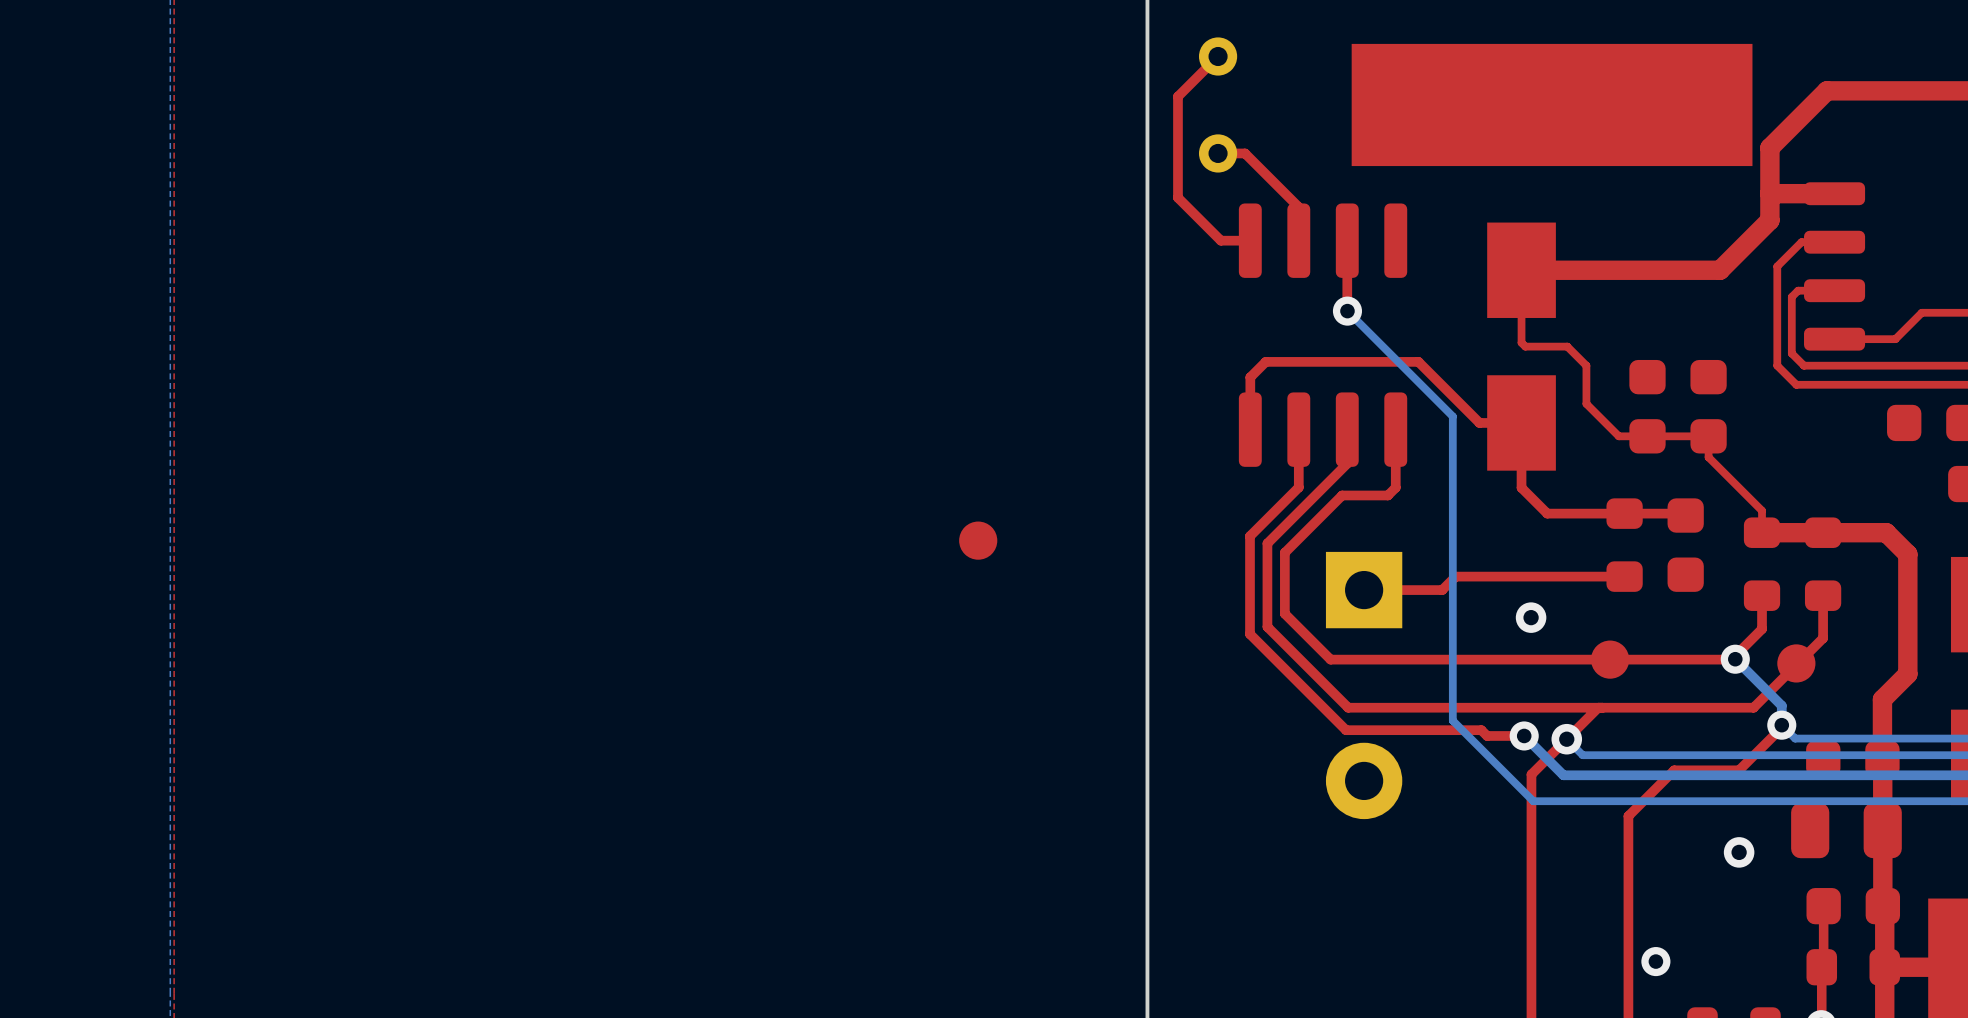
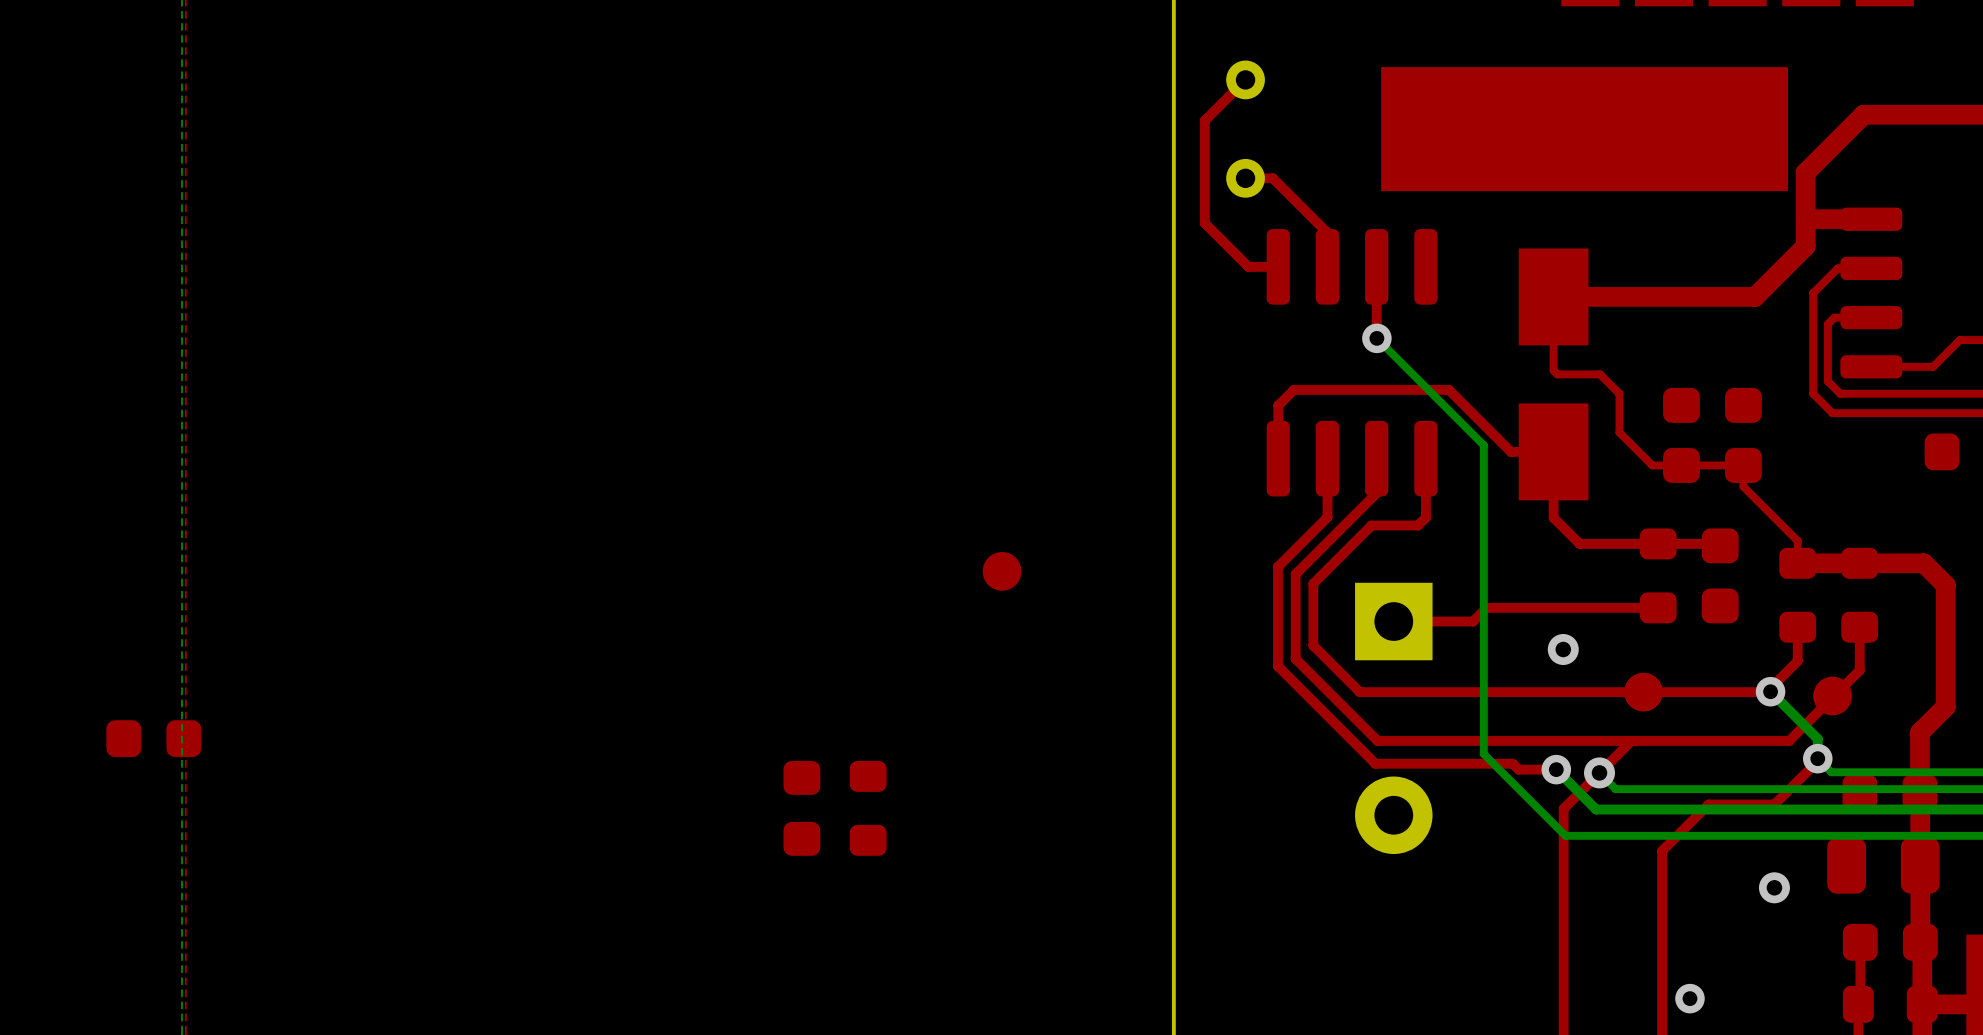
part: none -> (153, 738)
part: none -> (801, 808)
part: none -> (868, 808)

